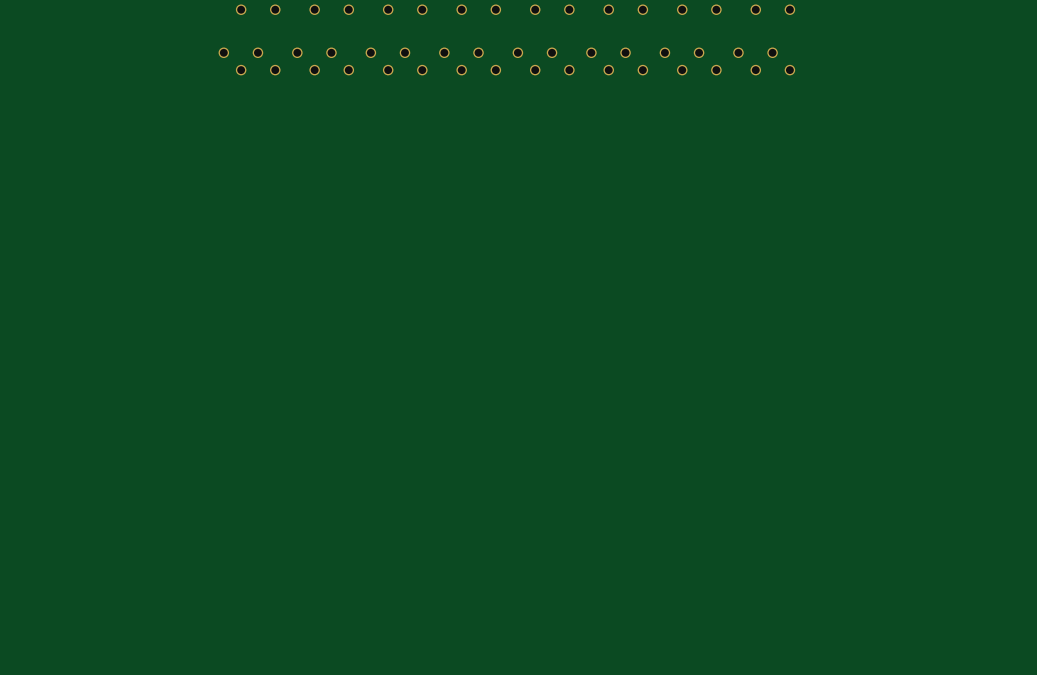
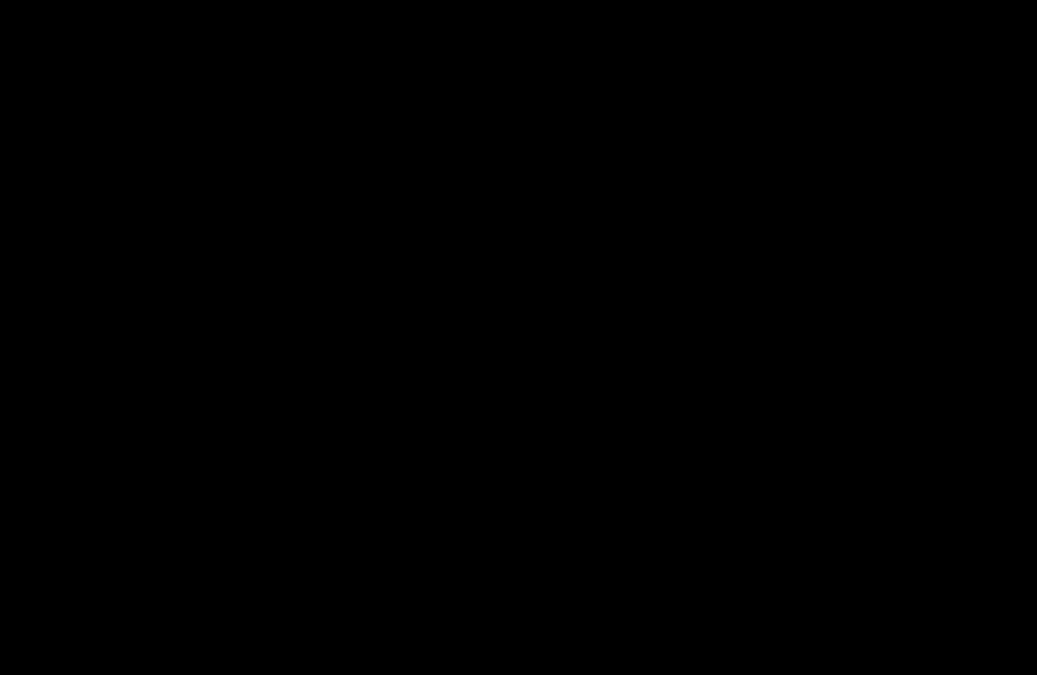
via: (241, 9) -> none
via: (275, 9) -> none
via: (314, 9) -> none
via: (348, 9) -> none
via: (388, 9) -> none
via: (422, 9) -> none
via: (461, 9) -> none
via: (495, 9) -> none
via: (535, 9) -> none
via: (569, 9) -> none
via: (608, 9) -> none
via: (642, 9) -> none
via: (682, 9) -> none
via: (716, 9) -> none
via: (755, 9) -> none
via: (789, 9) -> none
via: (223, 52) -> none
via: (257, 52) -> none
via: (297, 52) -> none
via: (331, 52) -> none
via: (370, 52) -> none
via: (404, 52) -> none
via: (444, 52) -> none
via: (478, 52) -> none
via: (517, 52) -> none
via: (552, 52) -> none
via: (591, 52) -> none
via: (625, 52) -> none
via: (664, 52) -> none
via: (699, 52) -> none
via: (738, 52) -> none
via: (772, 52) -> none
via: (241, 70) -> none
via: (275, 70) -> none
via: (314, 70) -> none
via: (348, 70) -> none
via: (388, 70) -> none
via: (422, 70) -> none
via: (461, 70) -> none
via: (495, 70) -> none
via: (535, 70) -> none
via: (569, 70) -> none
via: (608, 70) -> none
via: (642, 70) -> none
via: (682, 70) -> none
via: (716, 70) -> none
via: (755, 70) -> none
via: (789, 70) -> none

